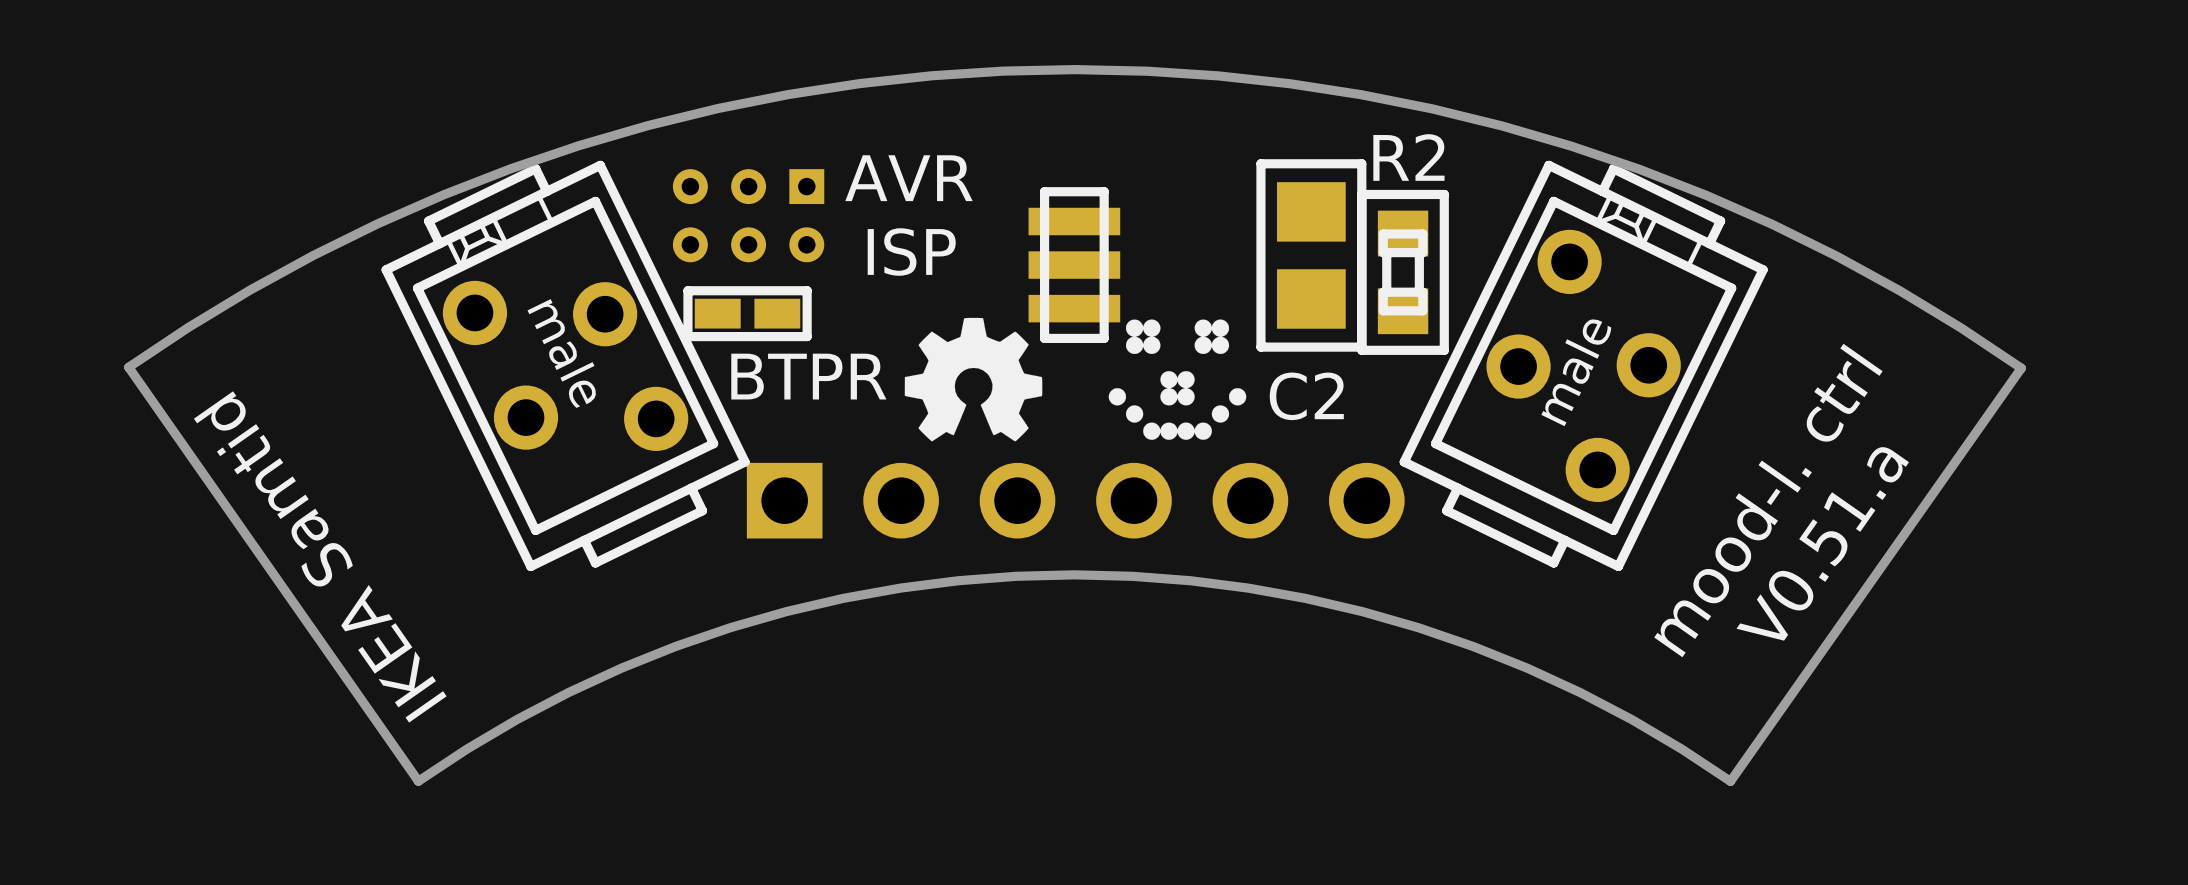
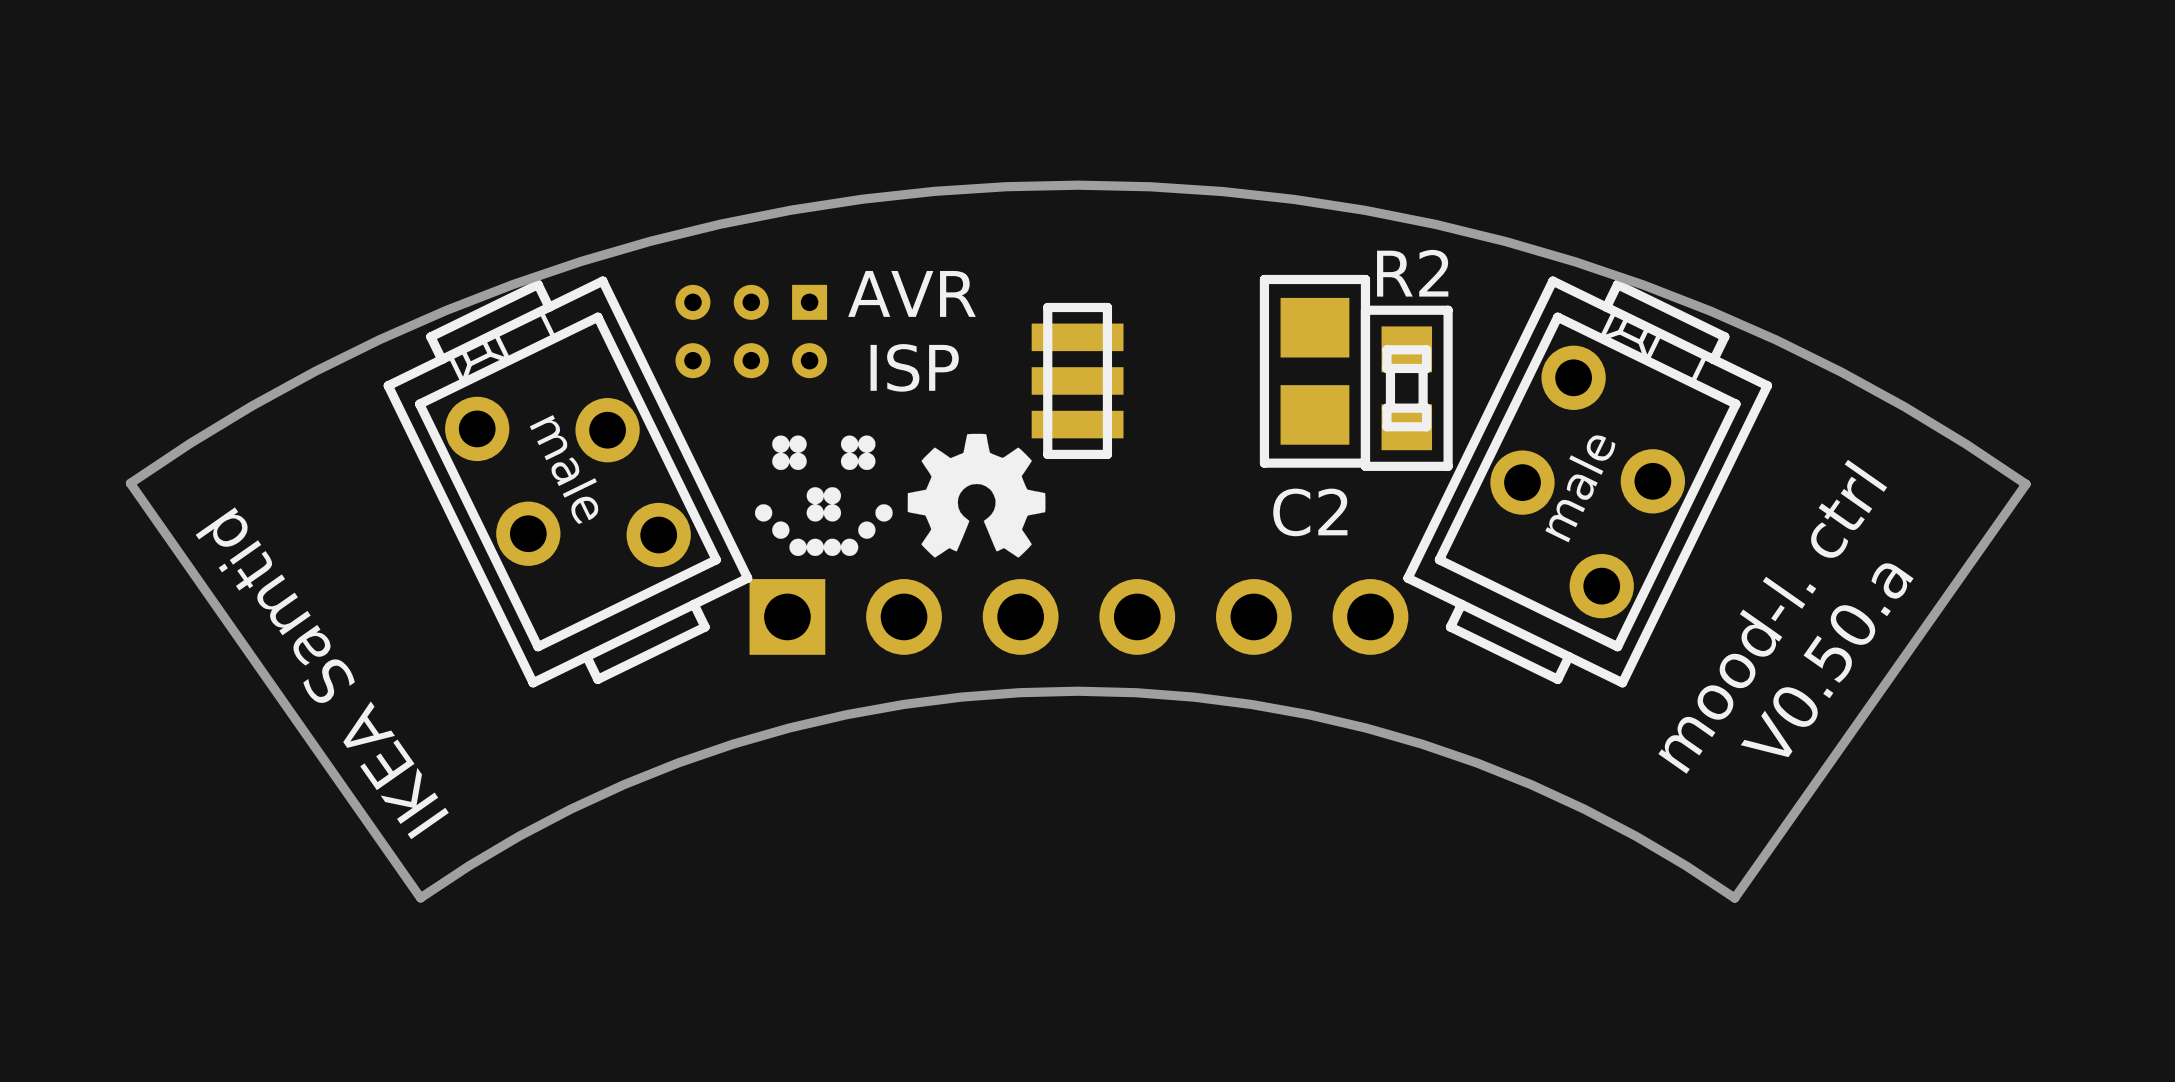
part: (747, 313) -> none
text: BTPR (808, 376) -> none
drawing position: (1177, 379) -> (823, 495)
text: V0.51.a (1822, 543) -> V0.50.a (1827, 659)

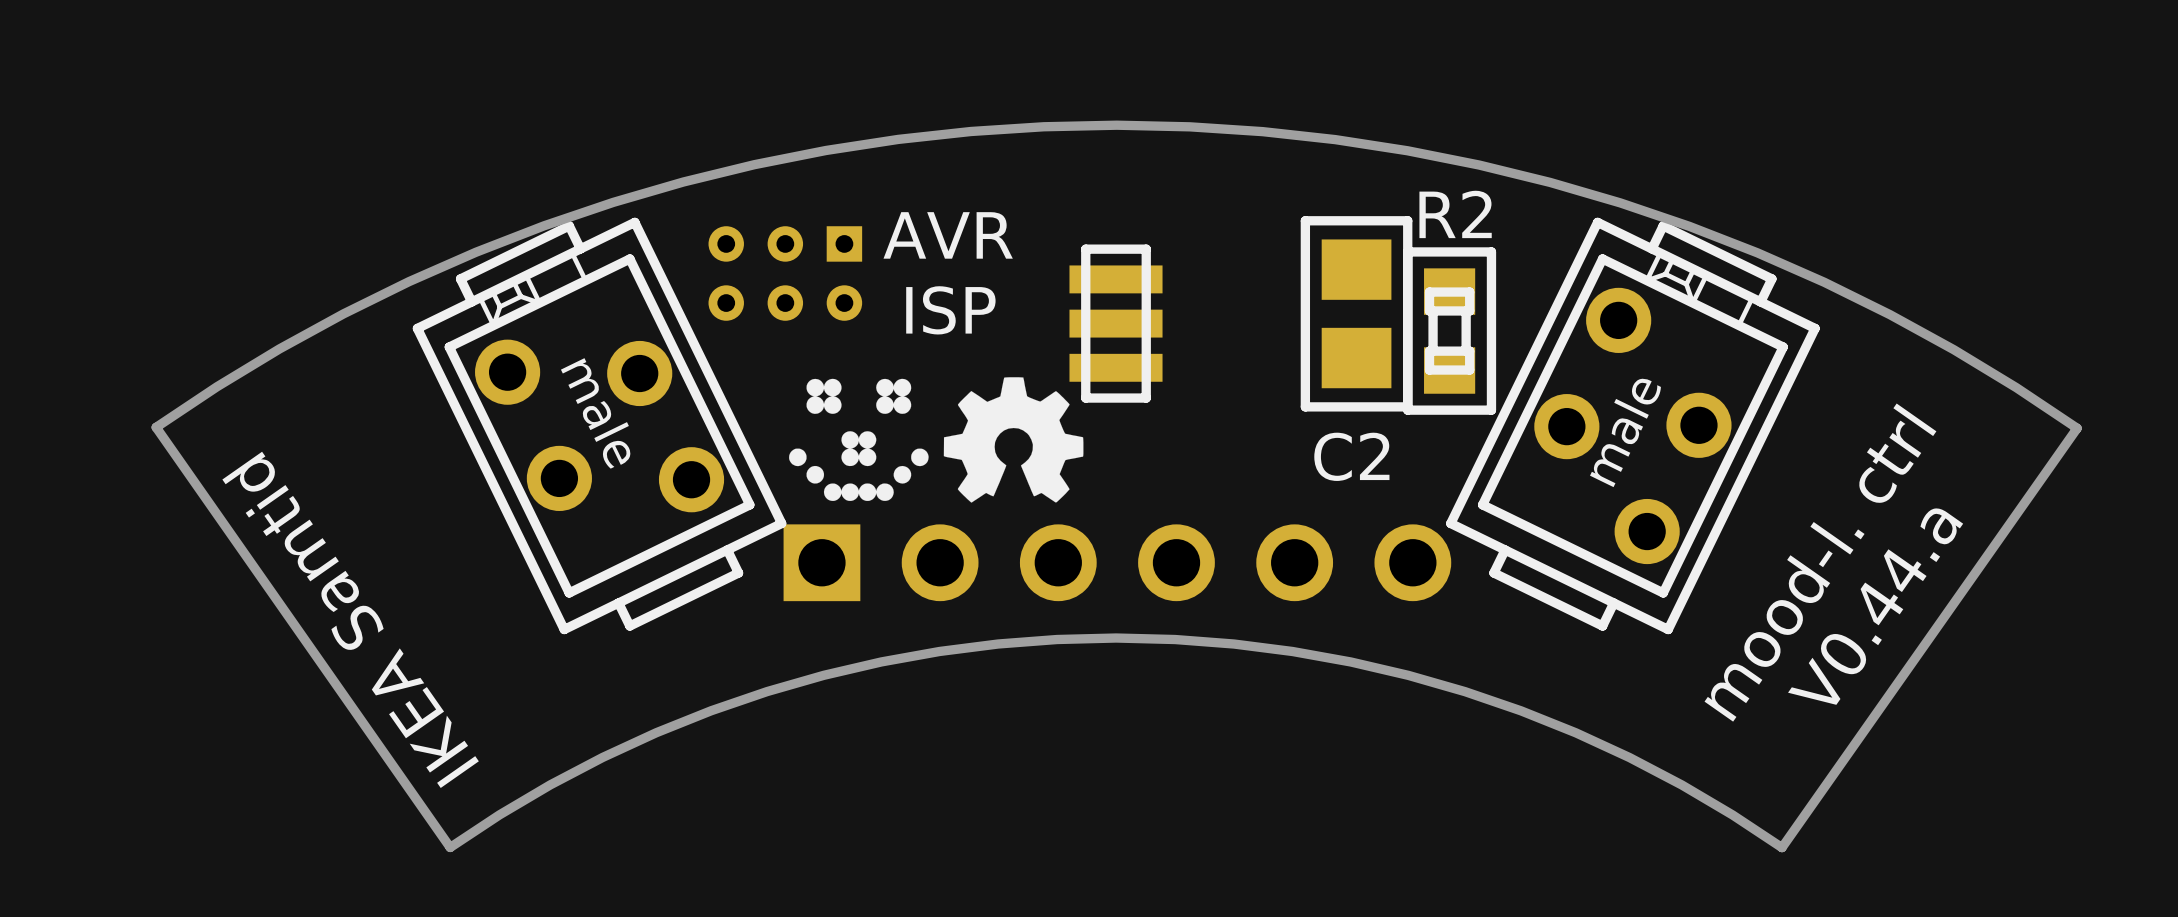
text: V0.50.a (1827, 659) -> V0.44.a (1875, 606)

